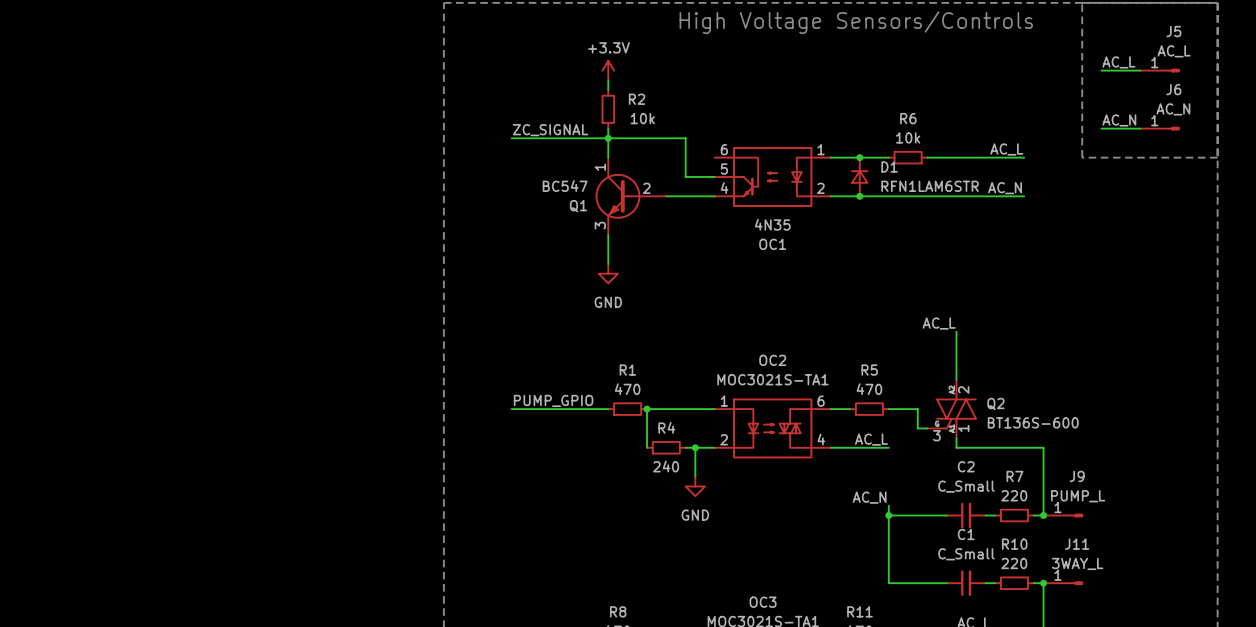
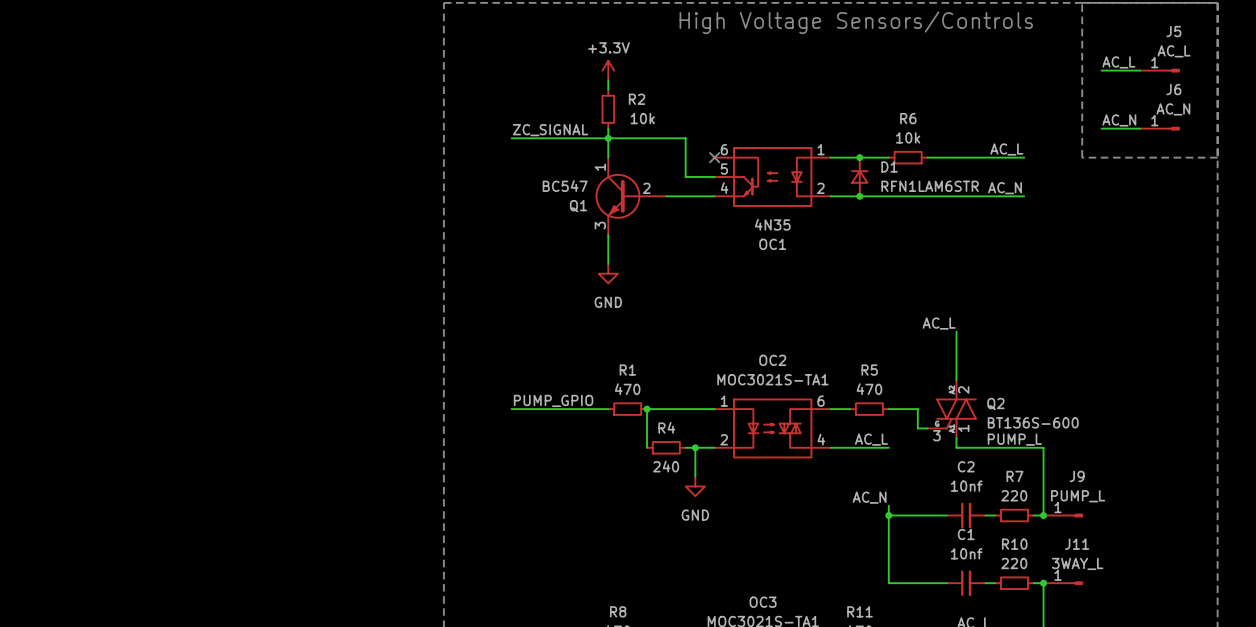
no-connect mark: none -> (714, 157)
label: none -> PUMP_L (1014, 439)
C2 value: C_Small (966, 486) -> 10nf (966, 486)
C1 value: C_Small (966, 554) -> 10nf (966, 553)

